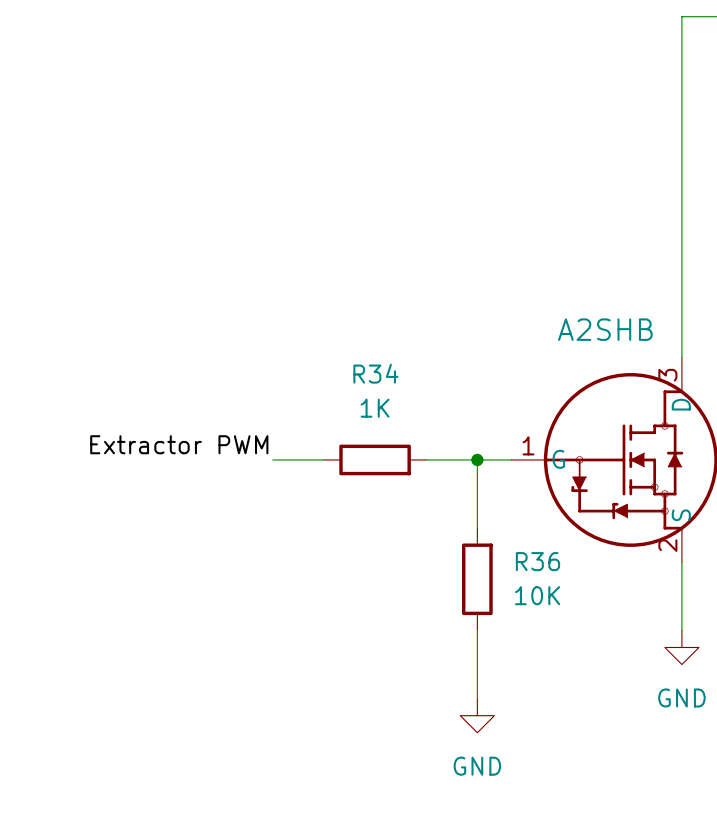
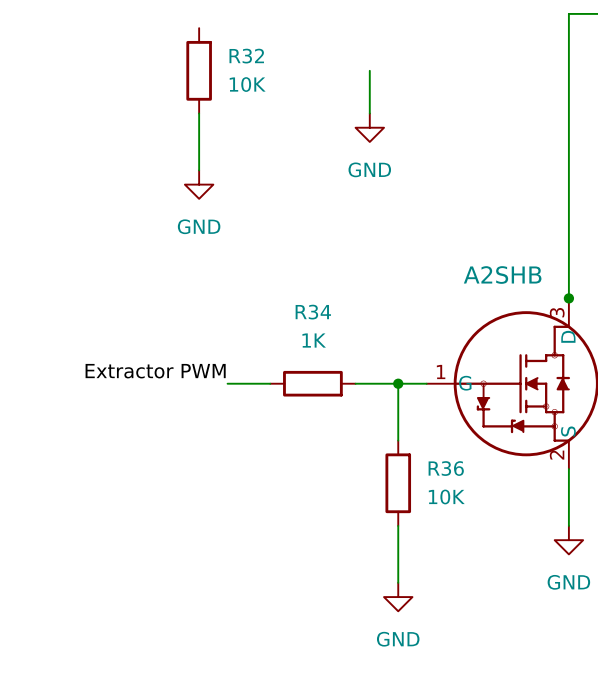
R32: none -> 10K (199, 70)
wire: none -> (369, 70) (369, 113)
wire: none -> (199, 113) (199, 170)
power symbol: none -> GND (369, 127)
power symbol: none -> GND (199, 184)
junction: none -> (568, 298)

